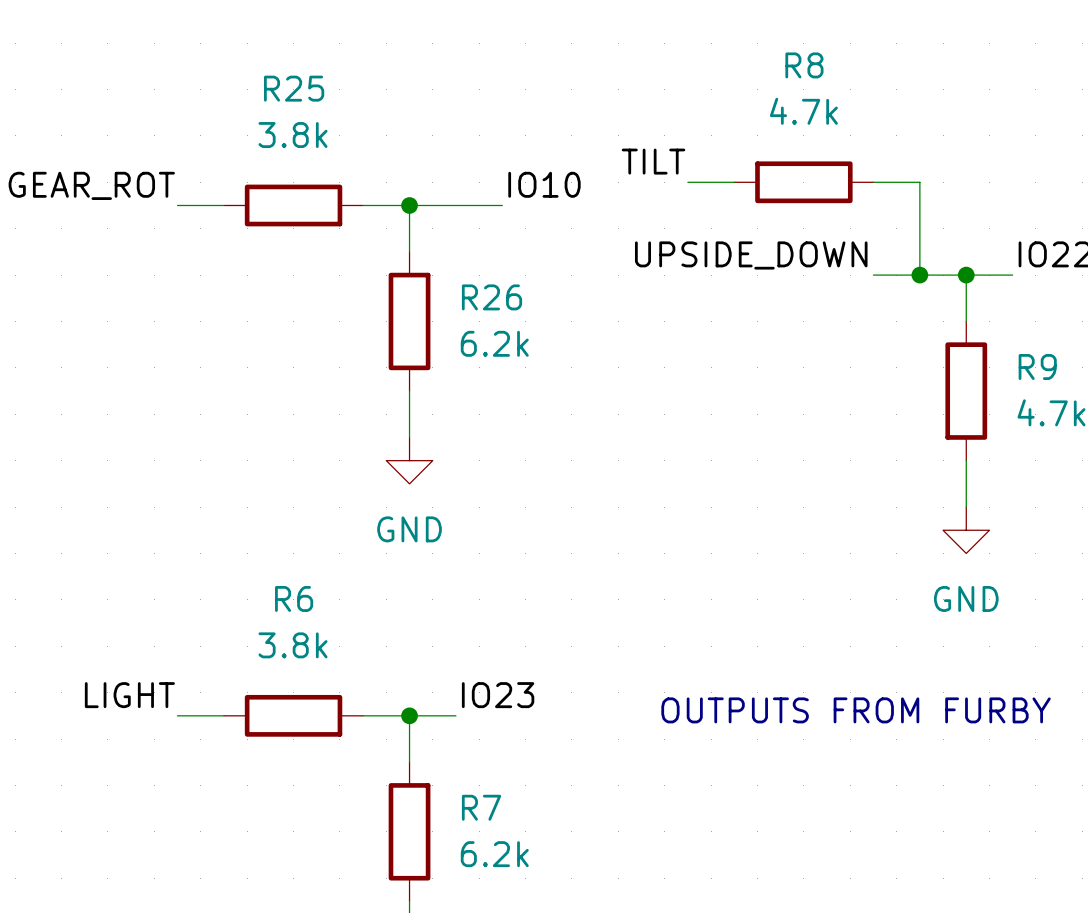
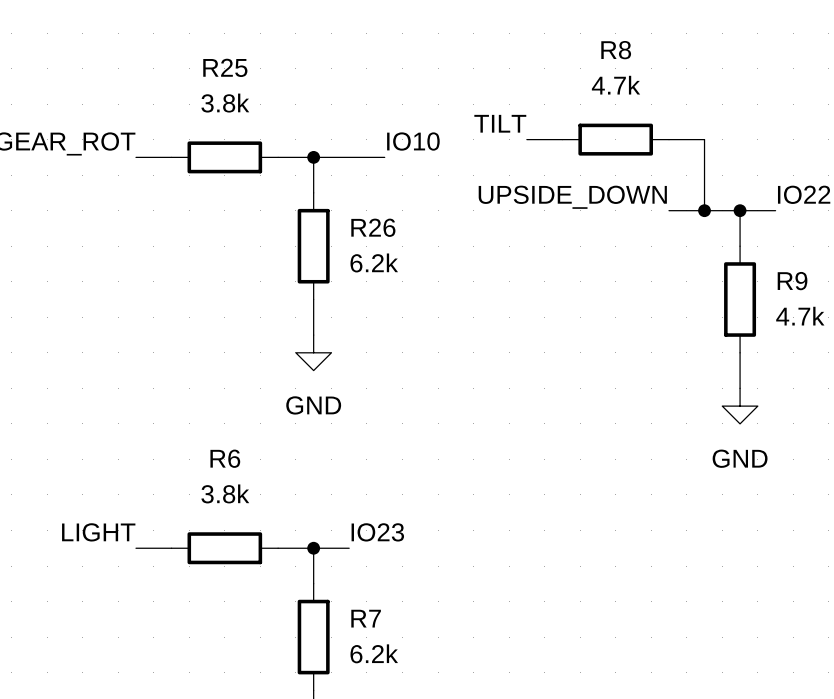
text: OUTPUTS FROM FURBY (856, 710) -> none

